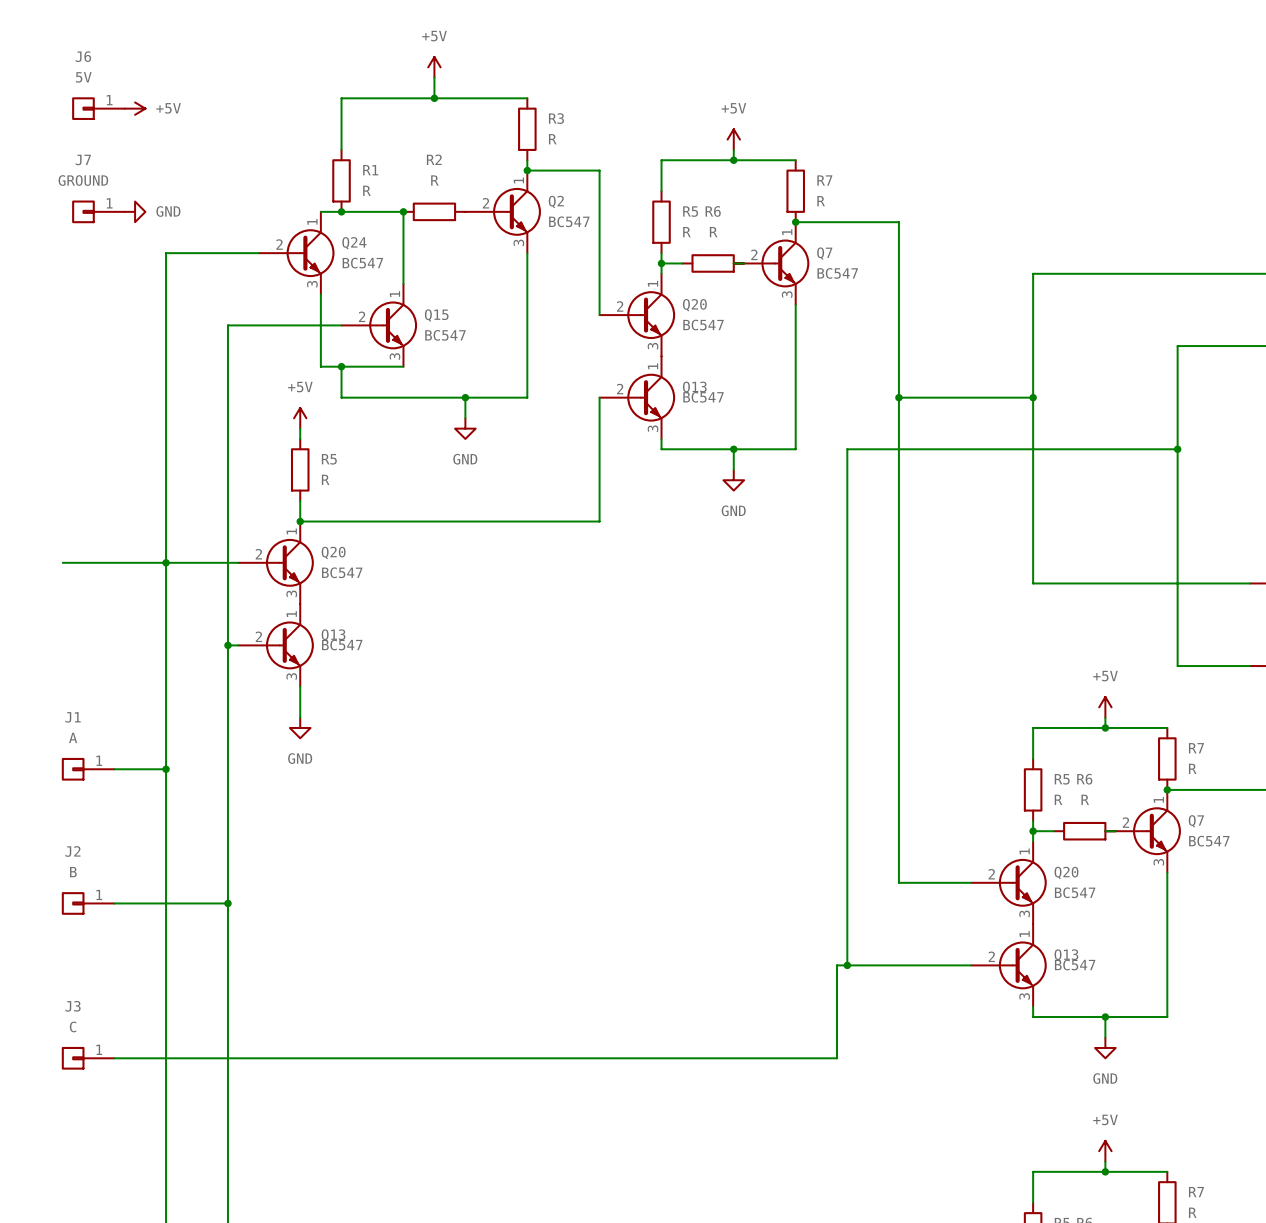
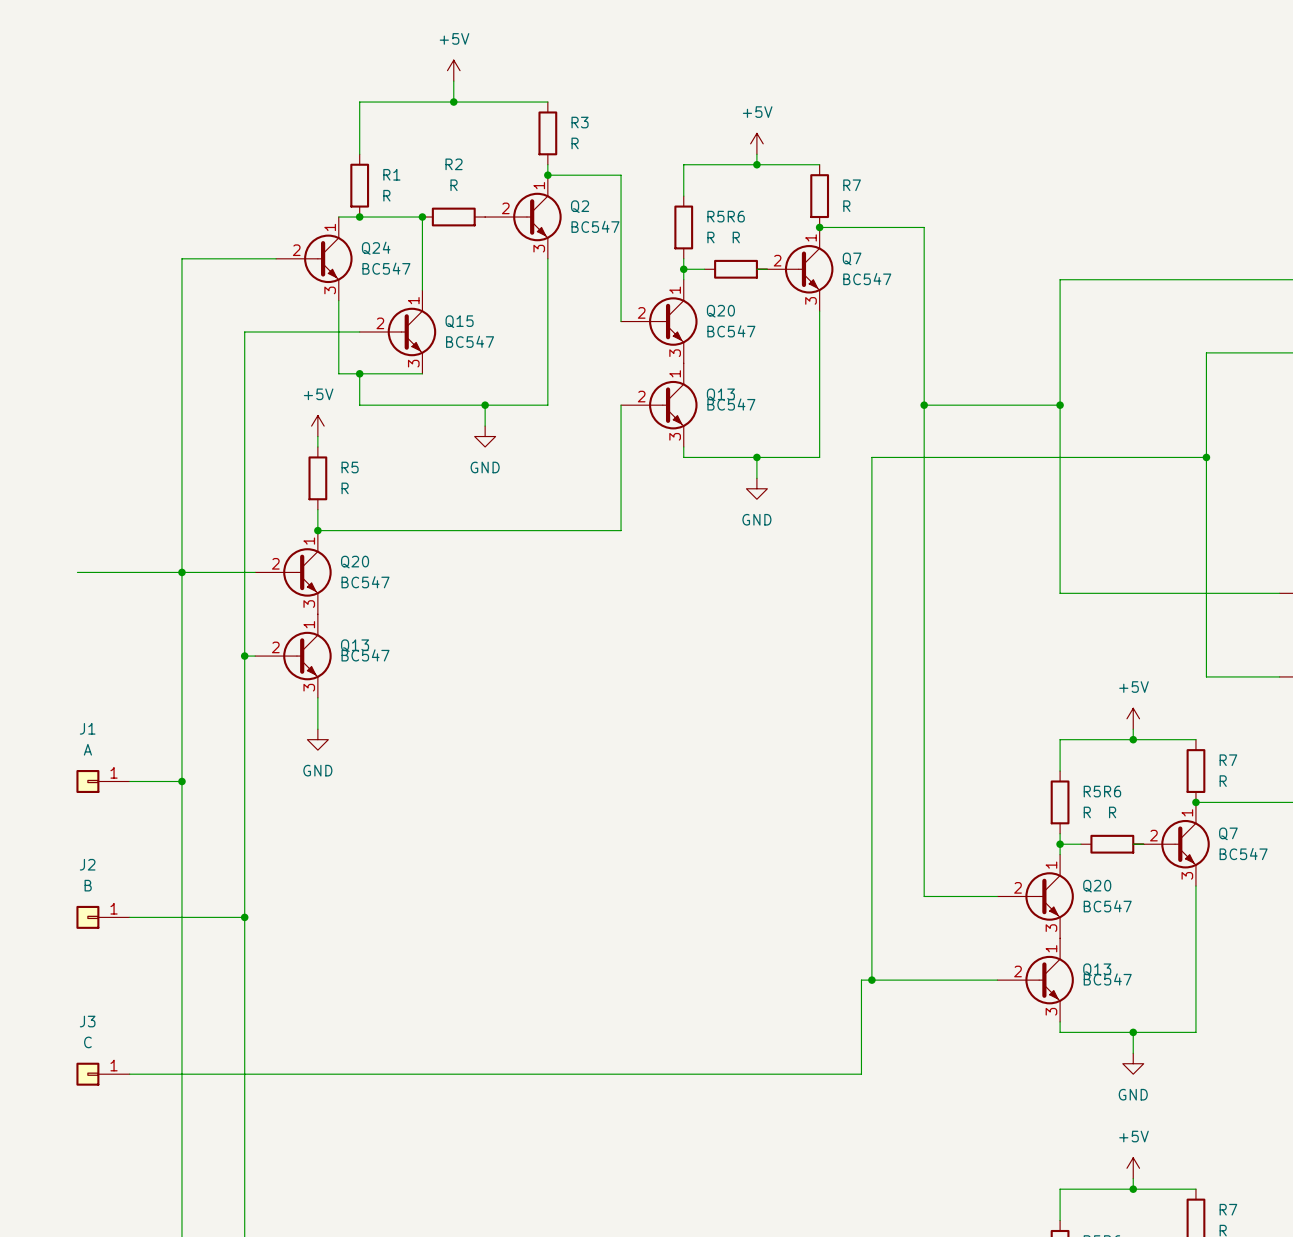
J6: 5V (98, 108) -> none
power symbol: +5V (135, 108) -> none
J7: GROUND (98, 211) -> none
power symbol: GND (135, 211) -> none

